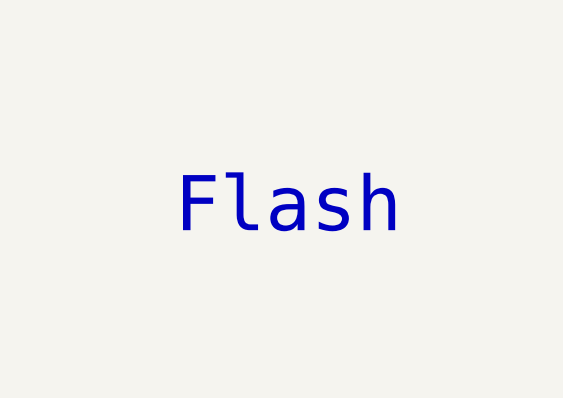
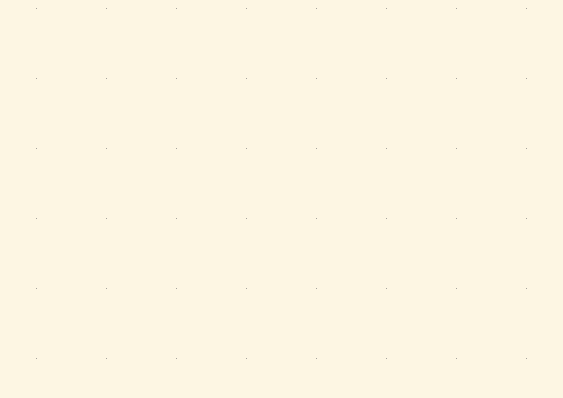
text: Flash (289, 201) -> none

